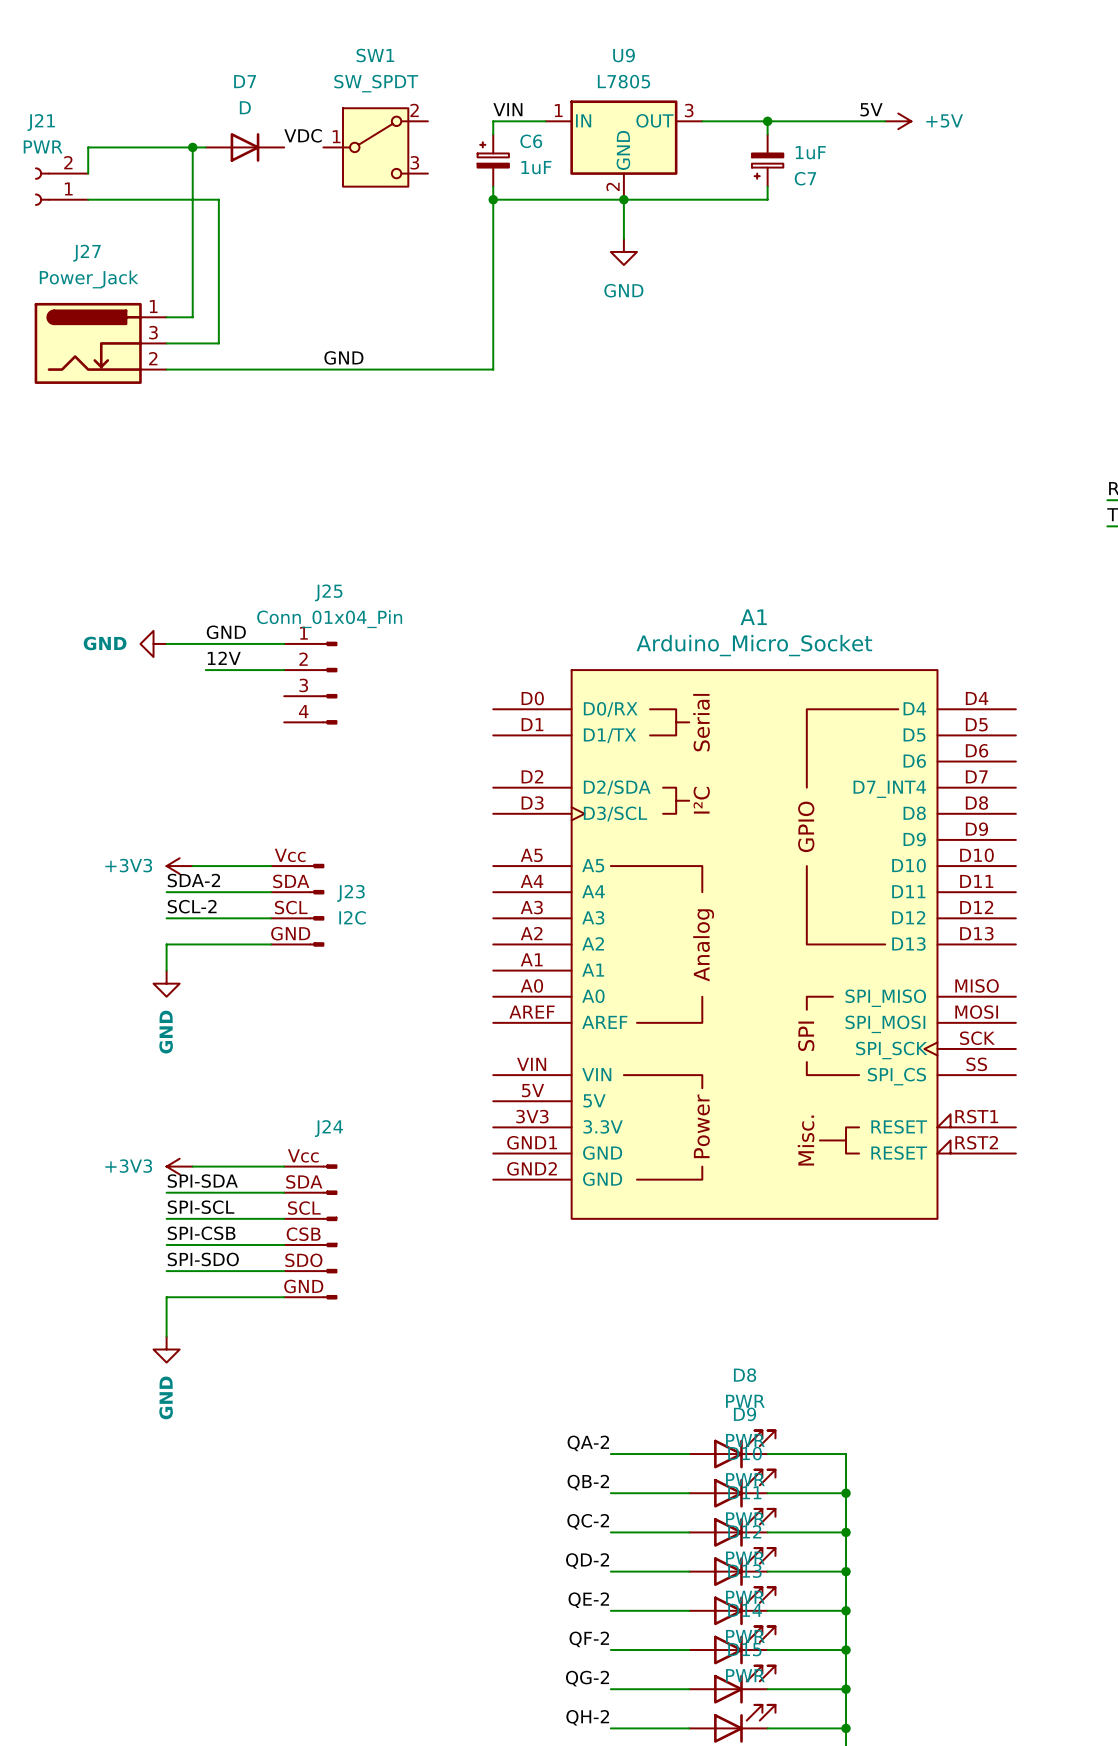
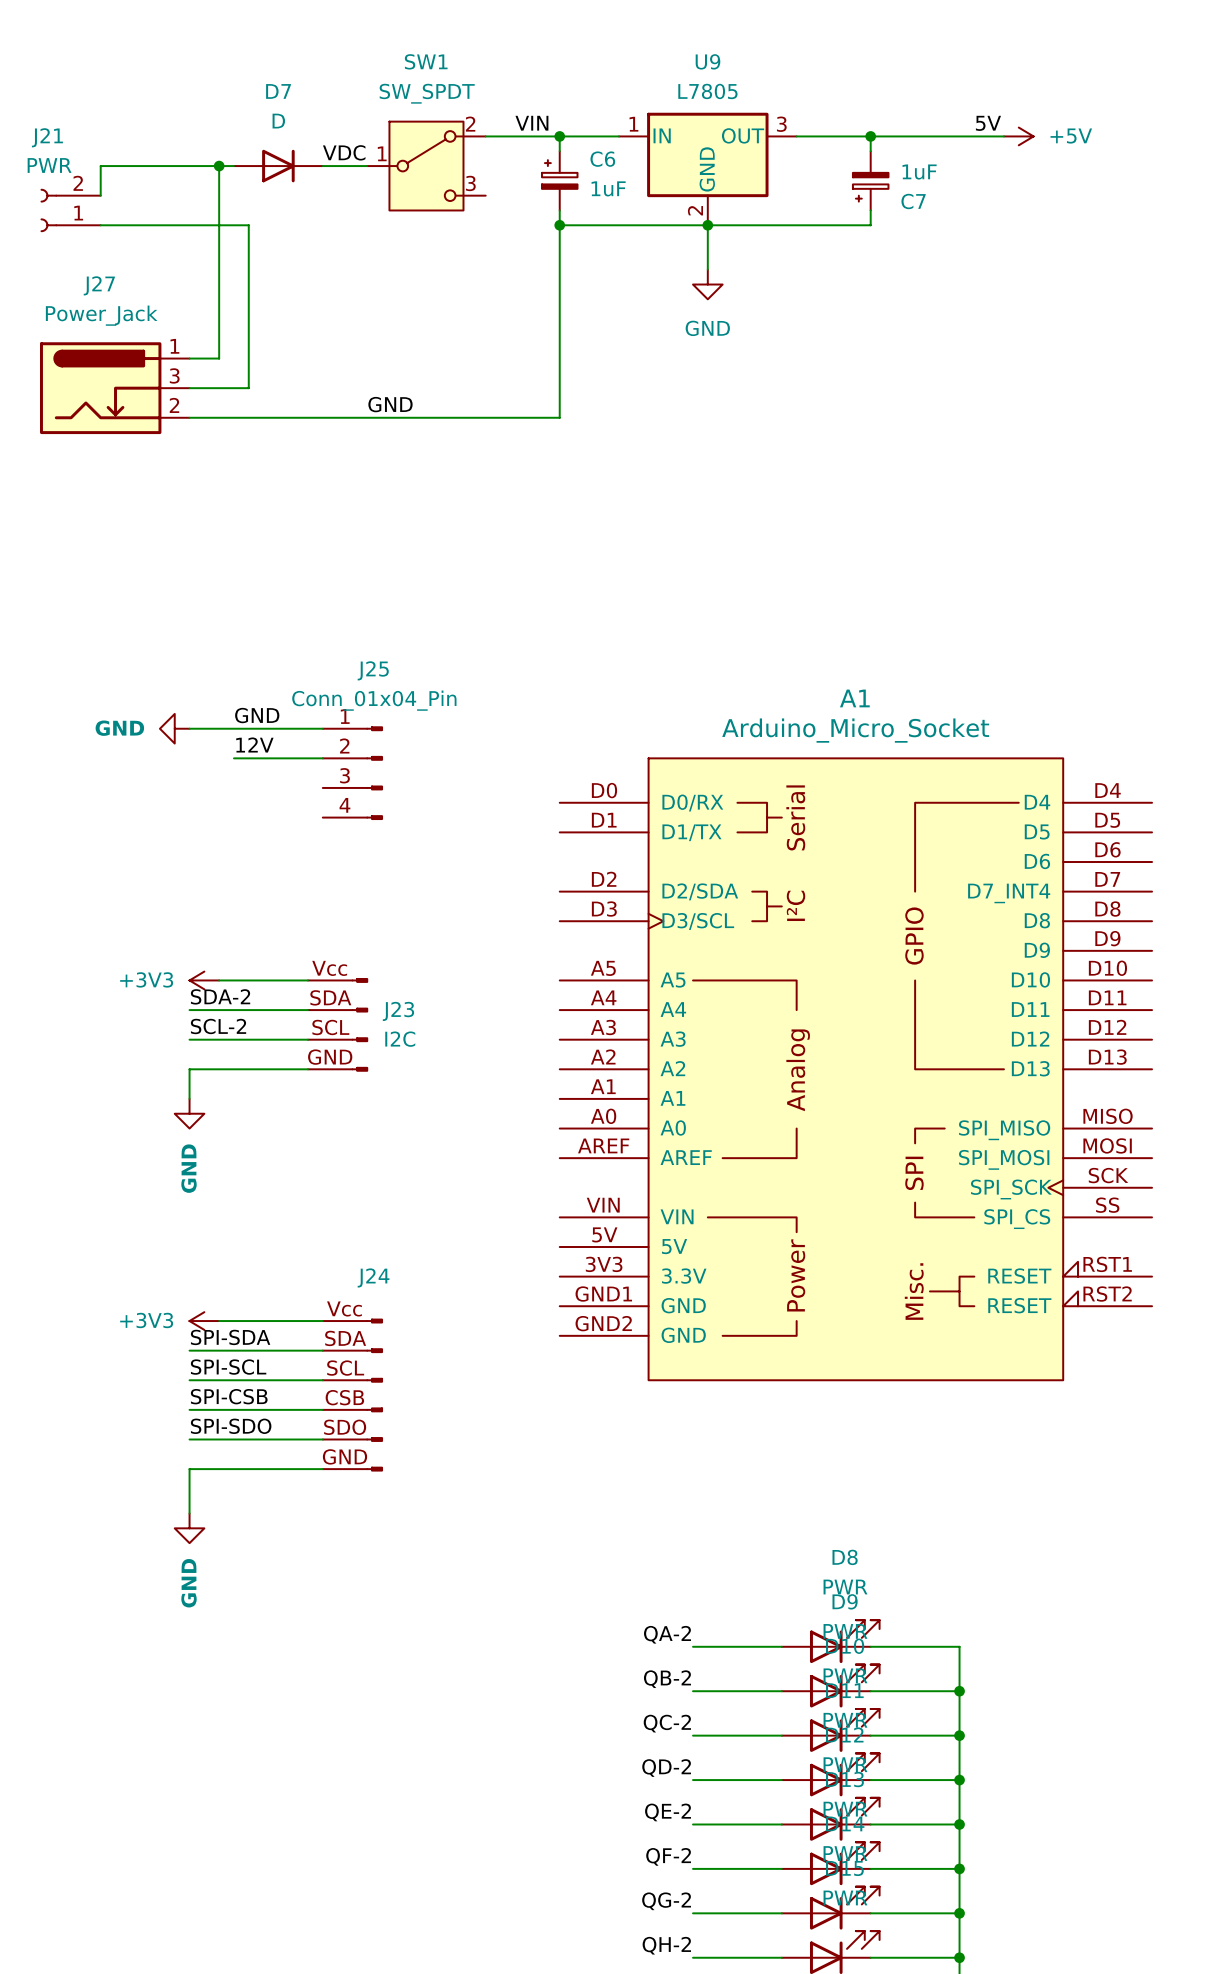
label position: VIN (507, 109) -> VIN (531, 123)
wire: none -> (485, 136) (559, 136)
junction: none -> (559, 136)
wire: none -> (322, 166) (367, 166)

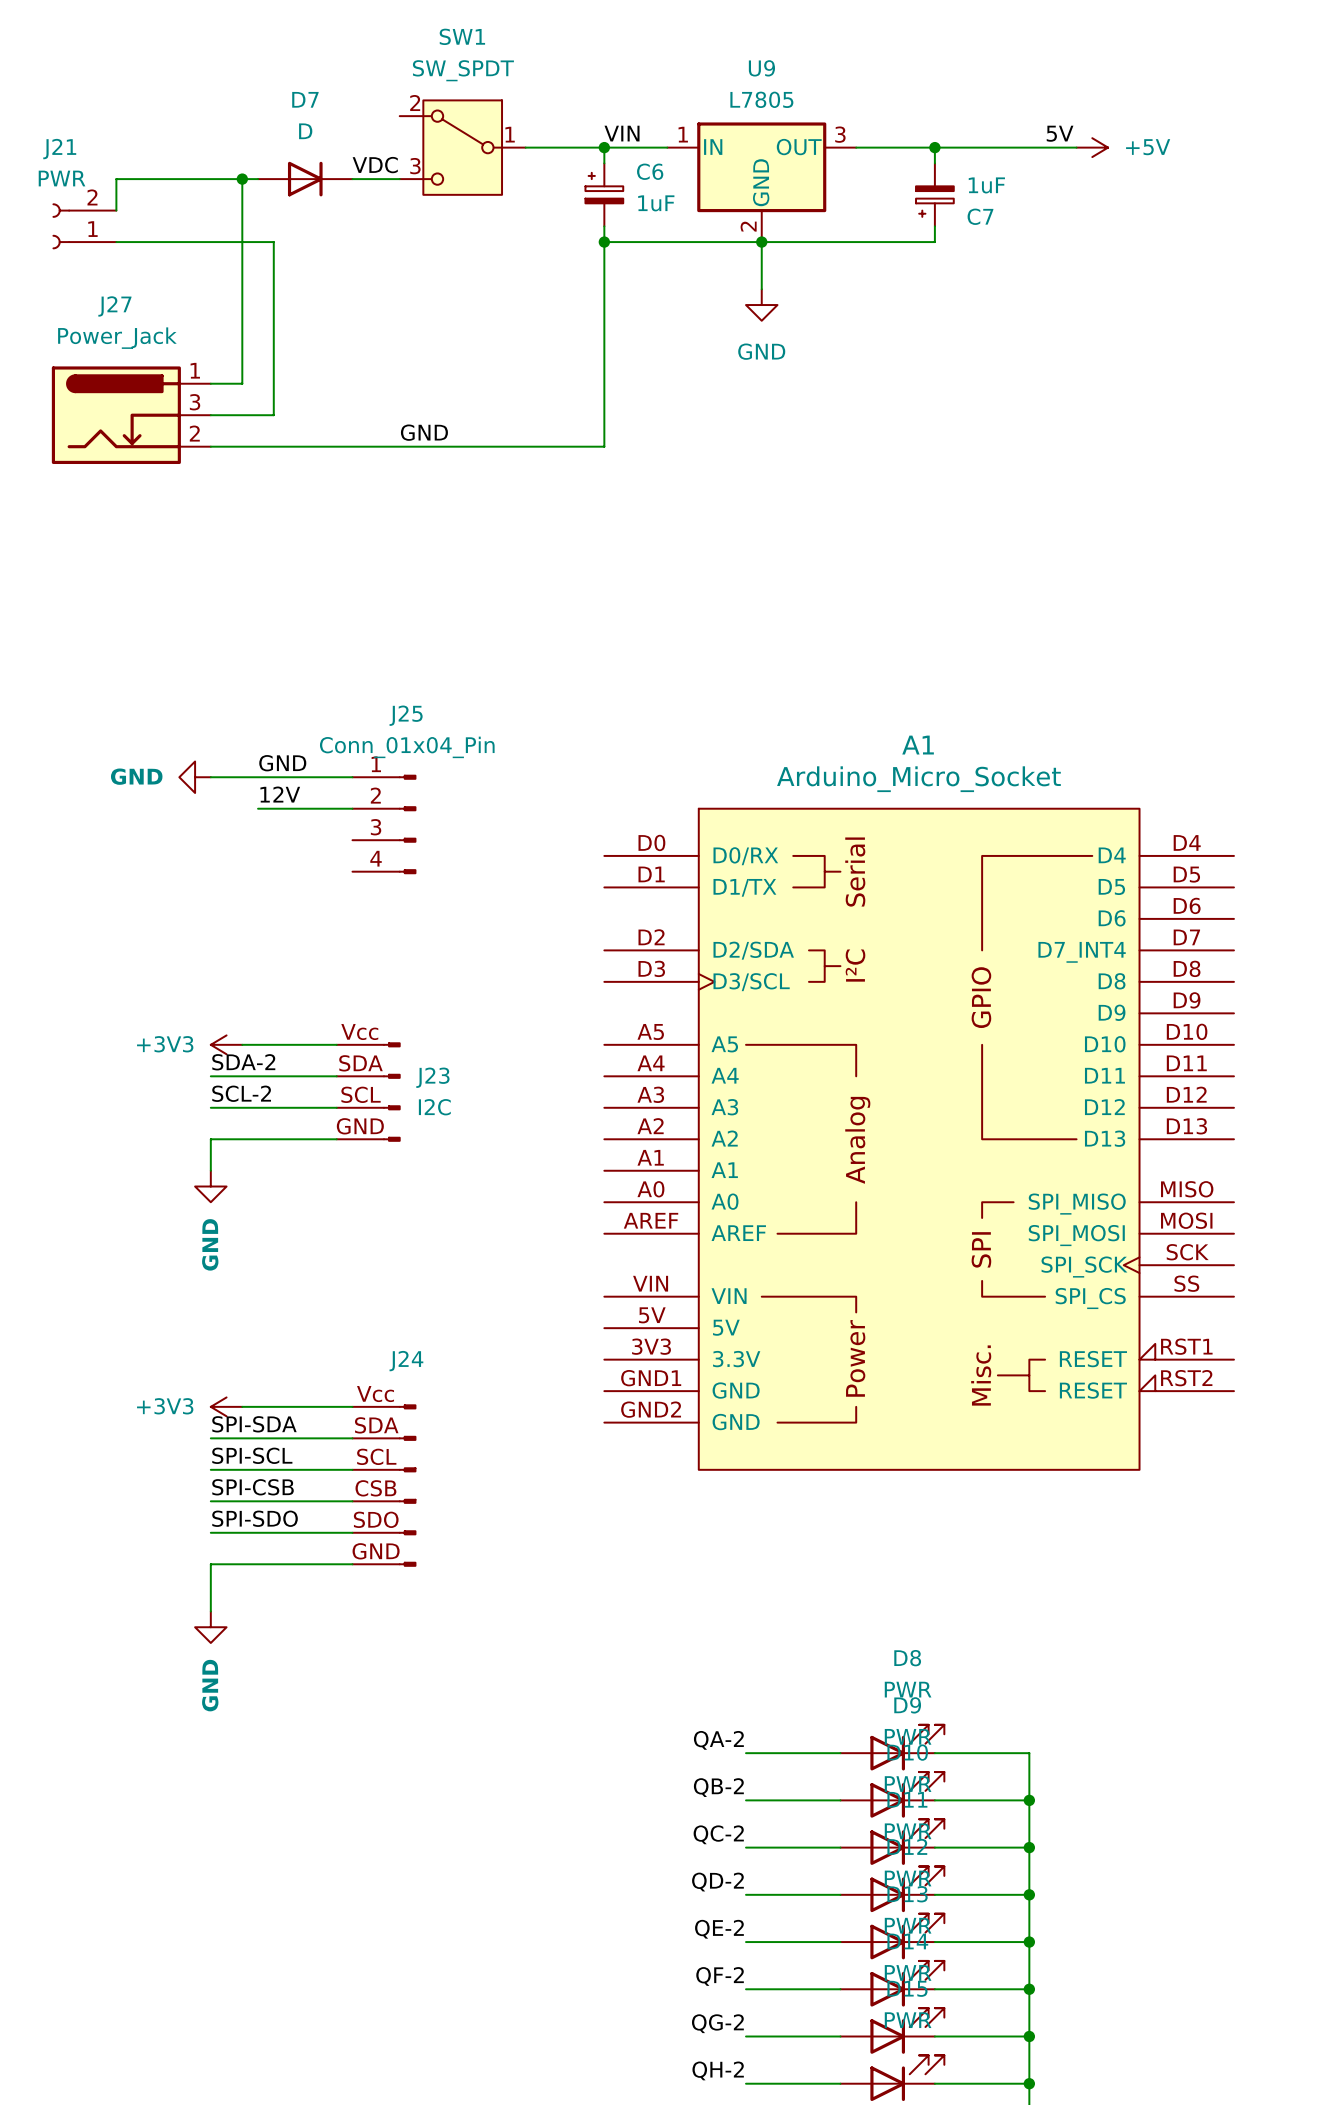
label position: VIN (531, 123) -> VIN (622, 133)
SW1 flip: as is (426, 166) -> left-right (462, 147)

